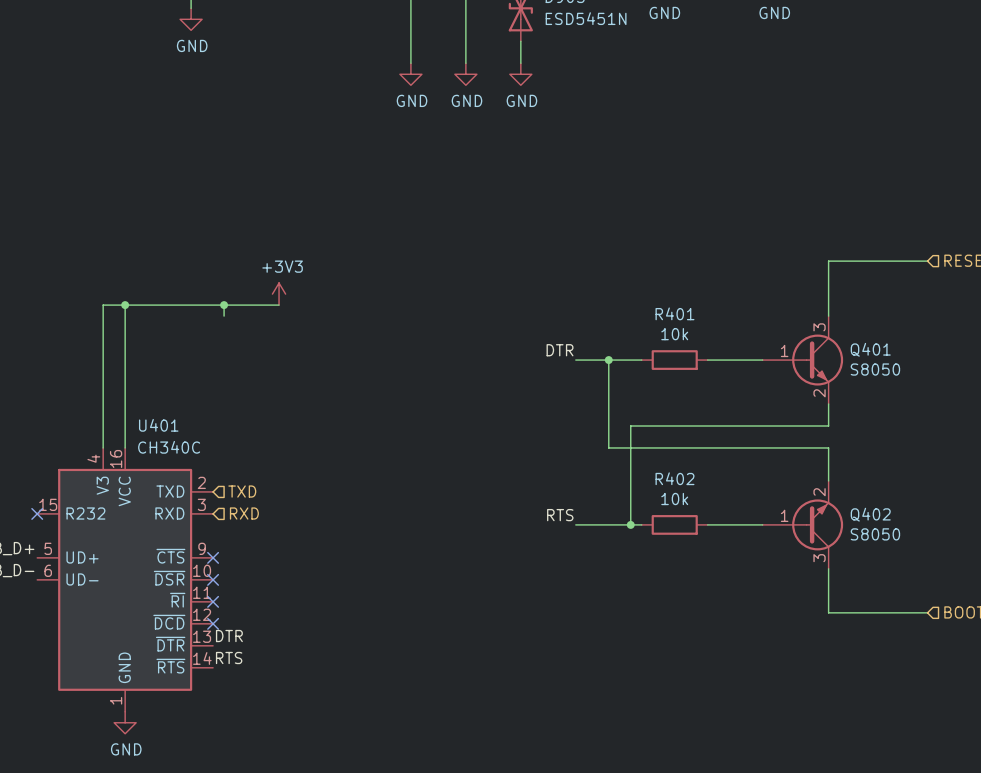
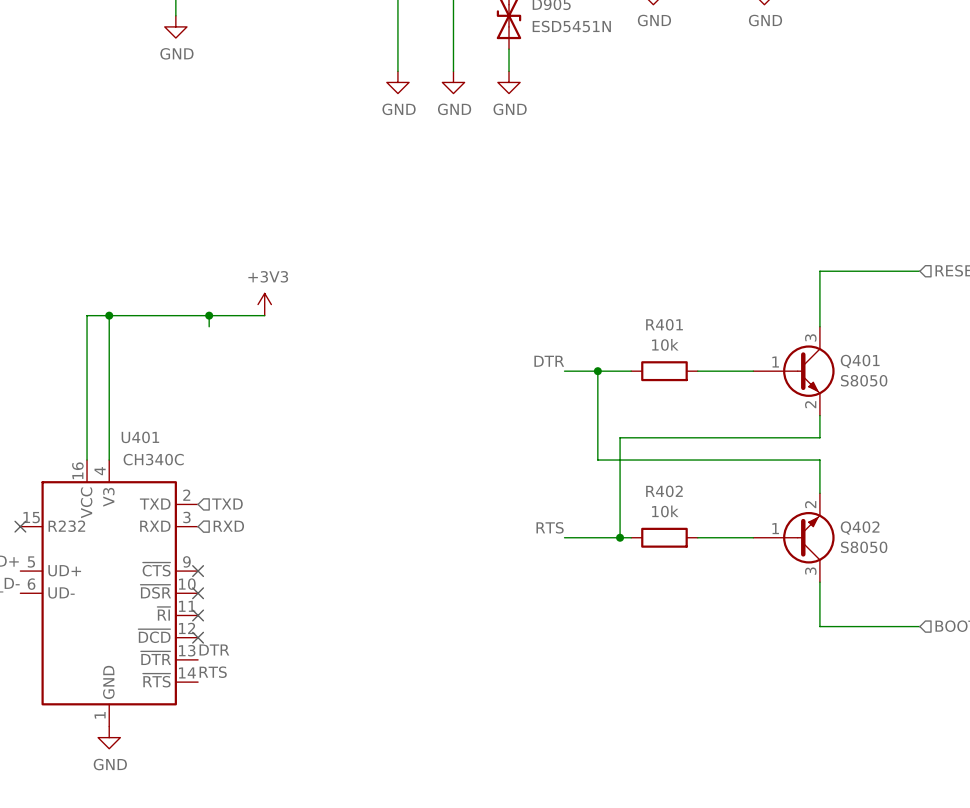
U401 pin number: 4 (93, 458) -> 16 (77, 470)
U401 pin number: 16 (116, 458) -> 4 (100, 471)
U401 pin name: V3 (102, 485) -> VCC (86, 502)
U401 pin name: VCC (124, 491) -> V3 (108, 497)

